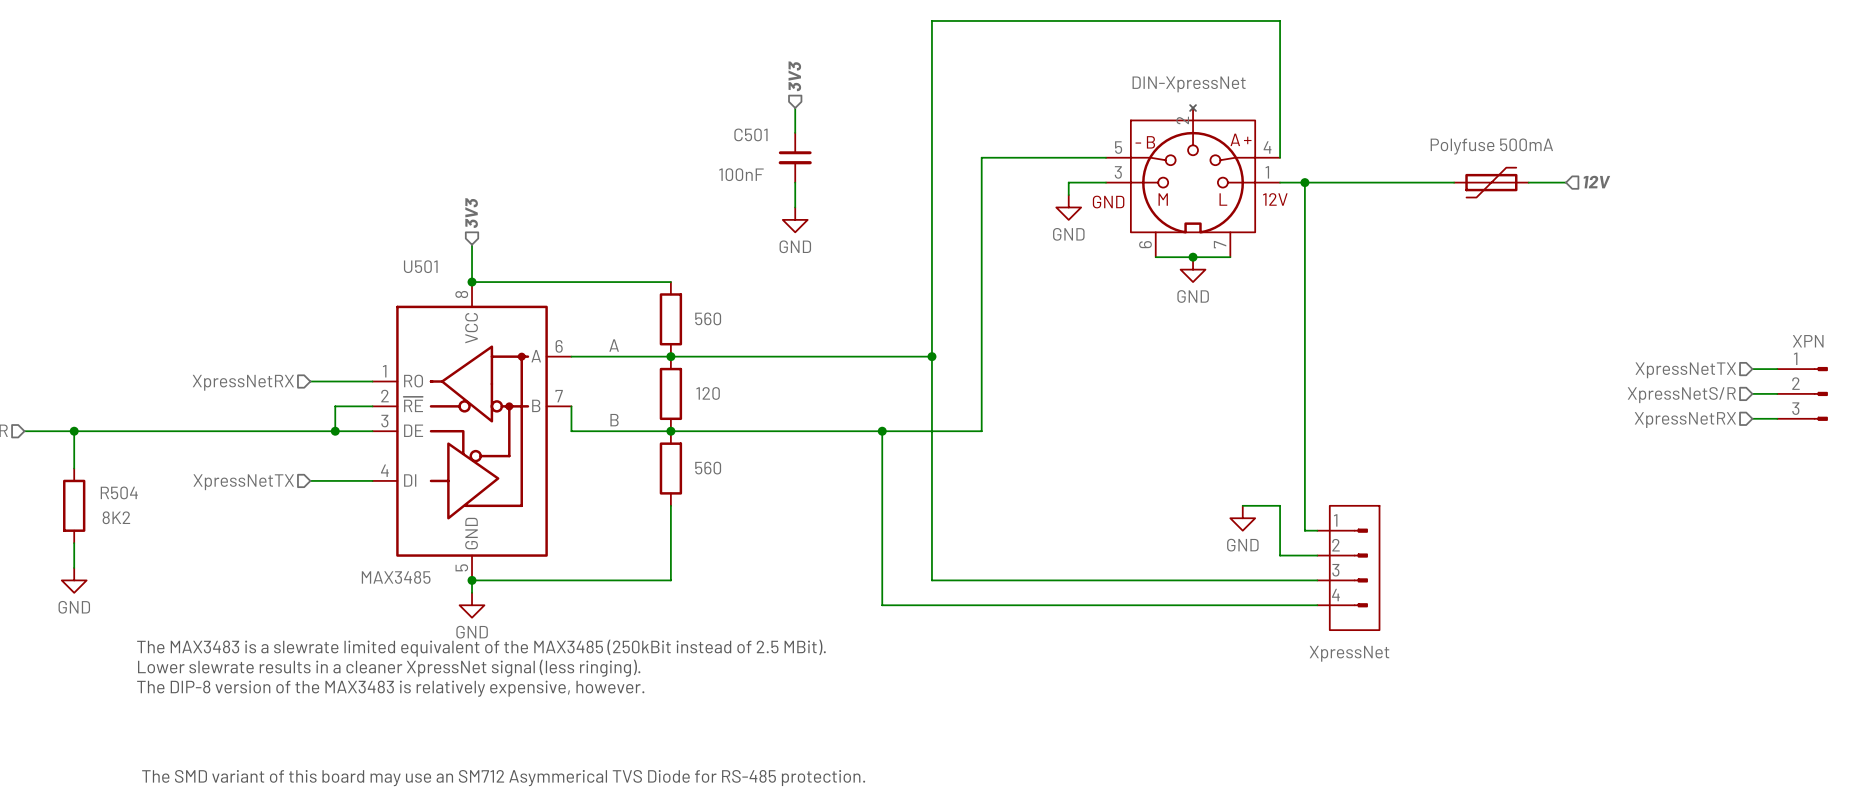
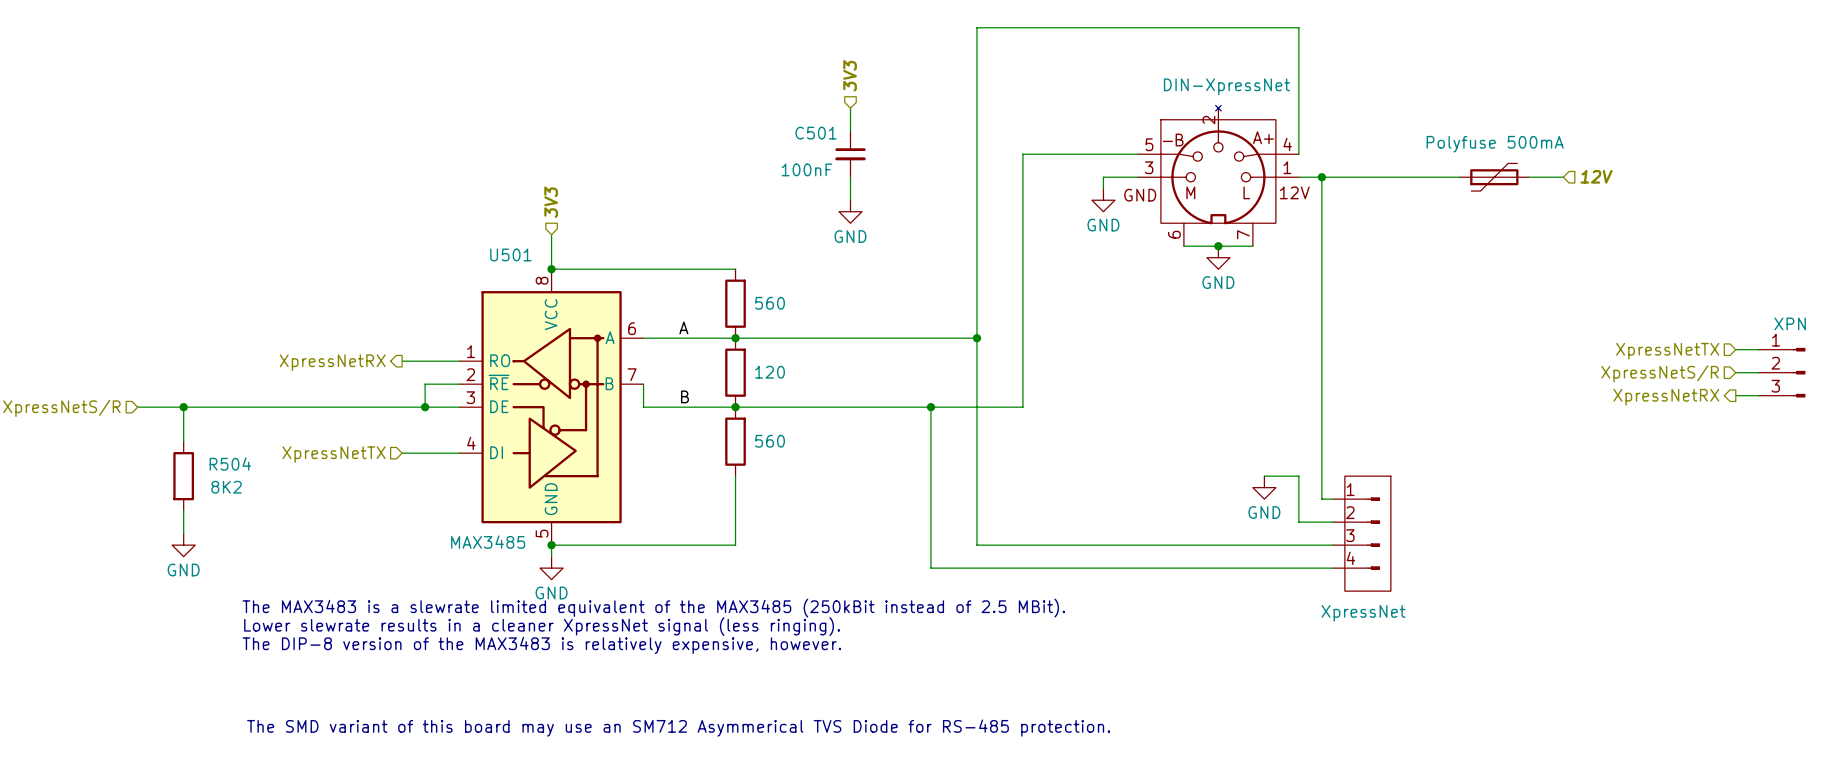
hierarchical label shape: input (243, 382) -> output (332, 362)
hierarchical label shape: input (1685, 420) -> output (1666, 397)

